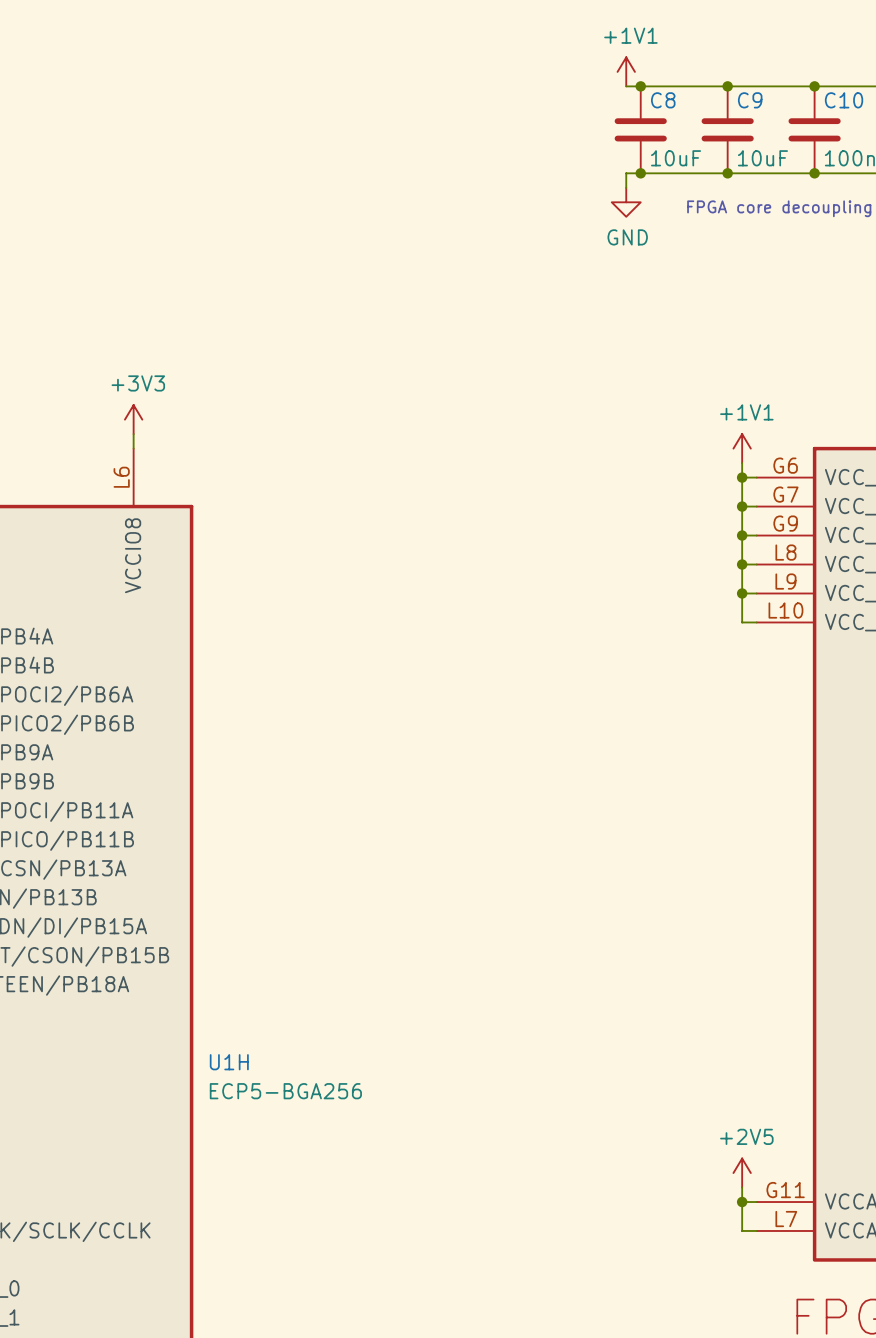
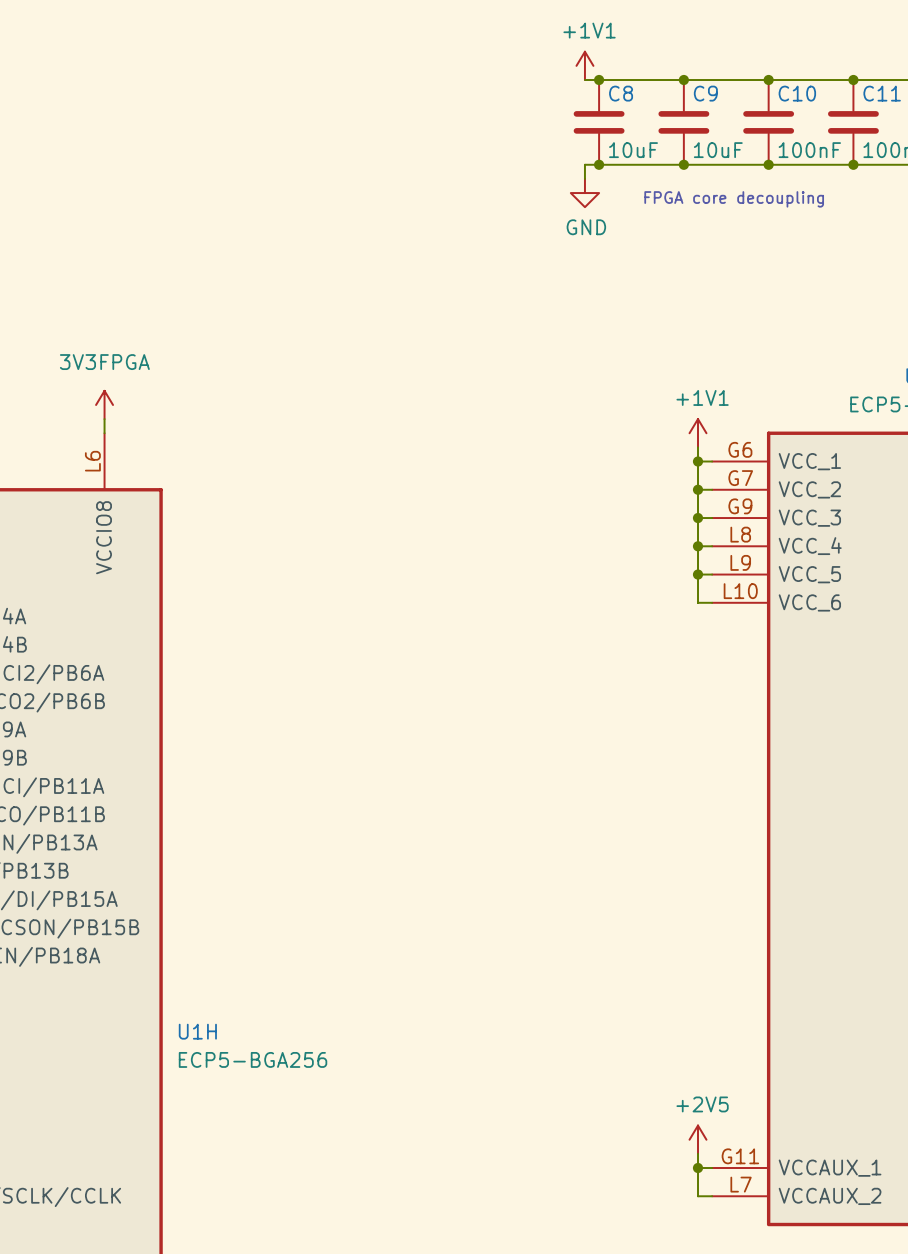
power symbol: +3V3 (133, 419) -> 3V3FPGA (104, 404)

